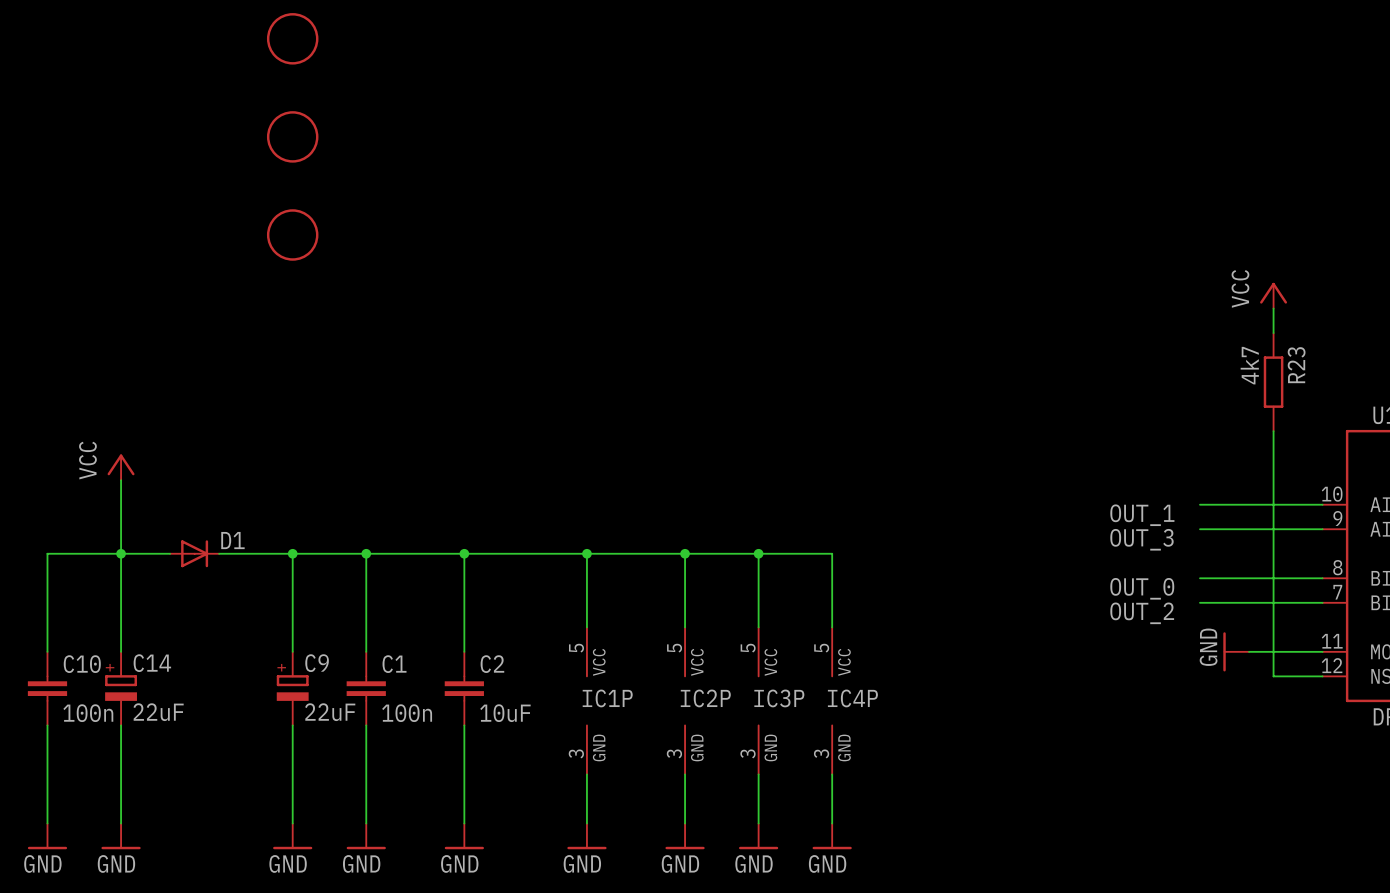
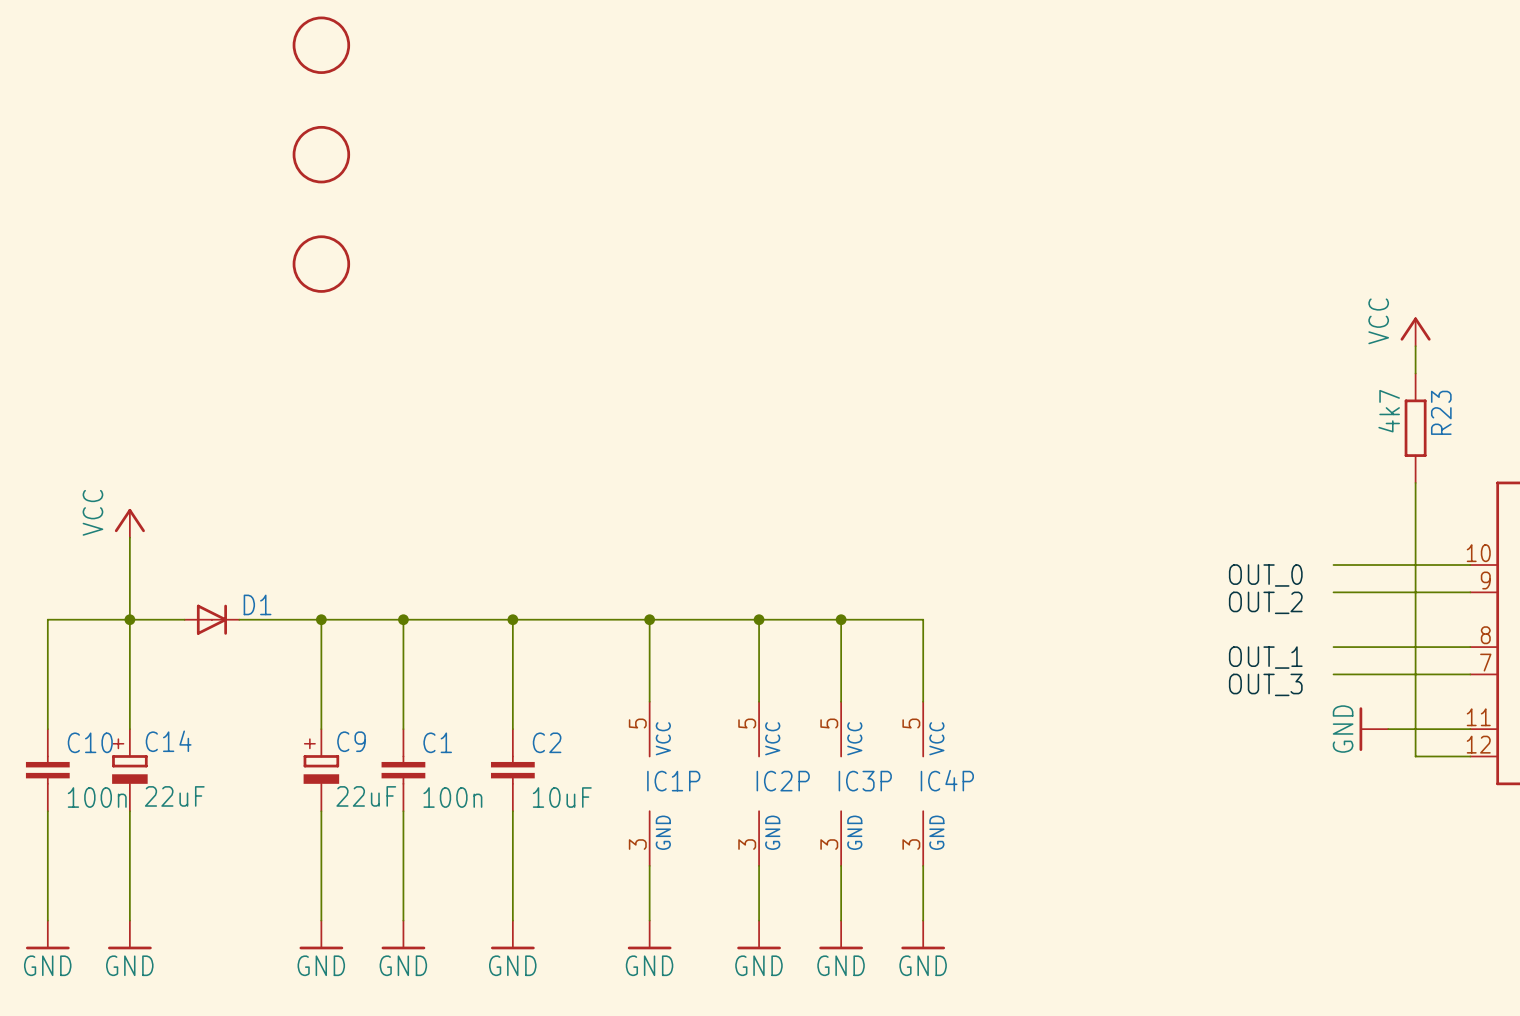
label: OUT_1 (1142, 515) -> OUT_0 (1265, 575)
label: OUT_3 (1141, 539) -> OUT_2 (1265, 602)
label: OUT_0 (1142, 588) -> OUT_1 (1265, 657)
label: OUT_2 (1142, 613) -> OUT_3 (1265, 684)

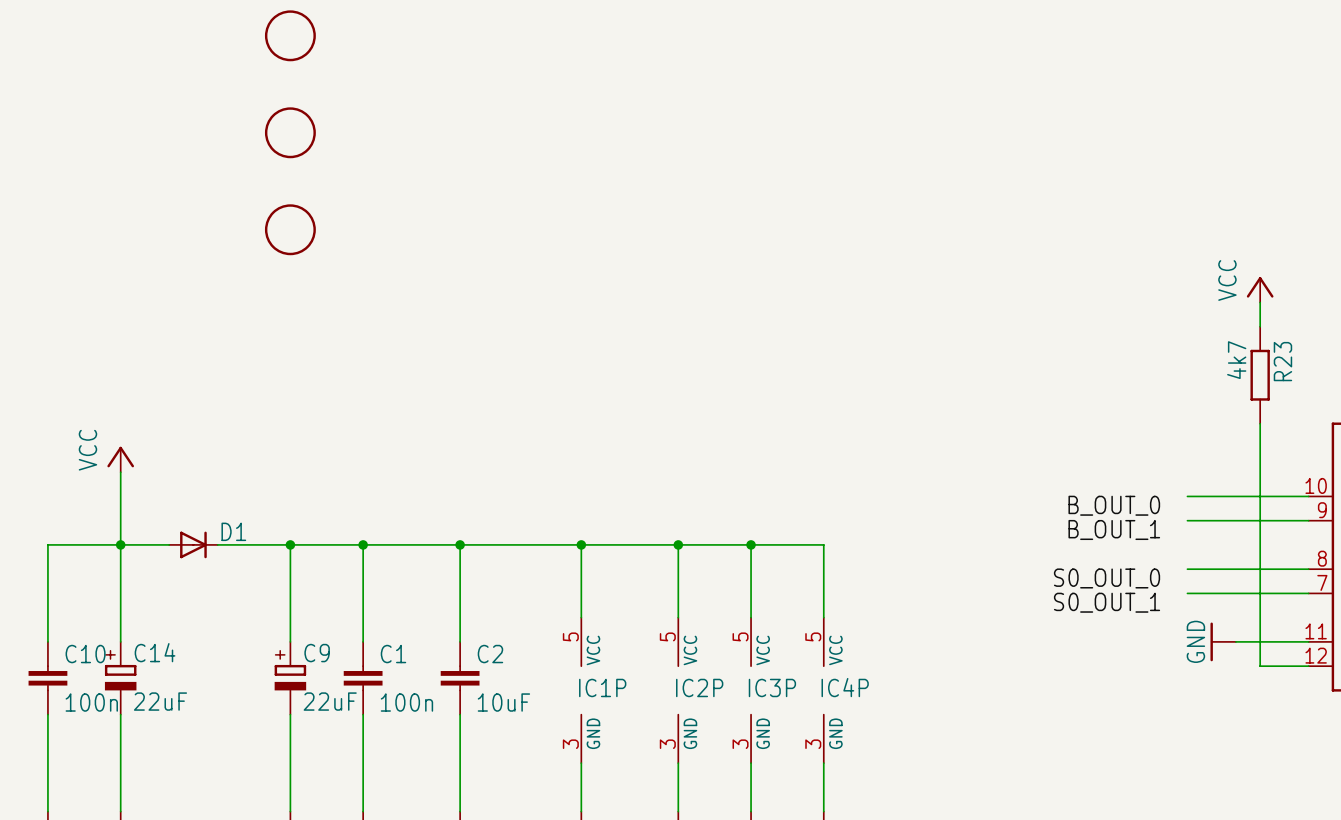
label: OUT_0 (1265, 575) -> B_OUT_0 (1114, 505)
label: OUT_2 (1265, 602) -> B_OUT_1 (1114, 529)
label: OUT_1 (1265, 657) -> S0_OUT_0 (1107, 578)
label: OUT_3 (1265, 684) -> S0_OUT_1 (1107, 602)

